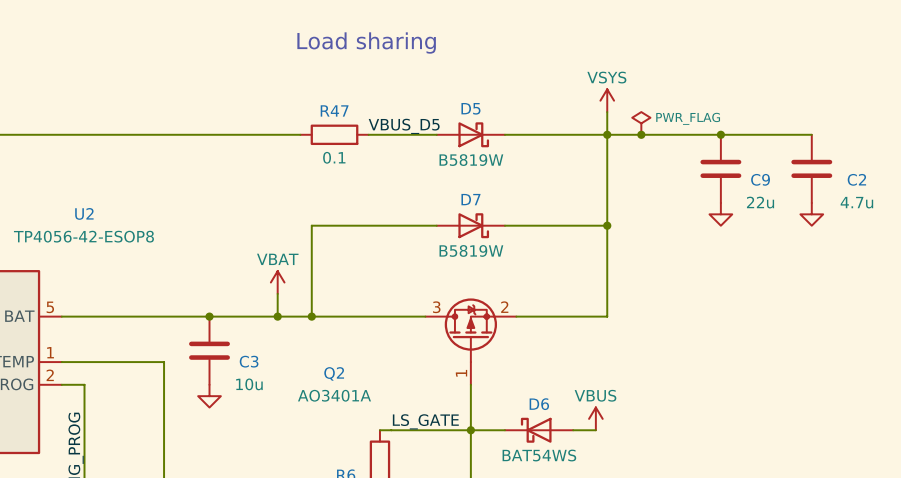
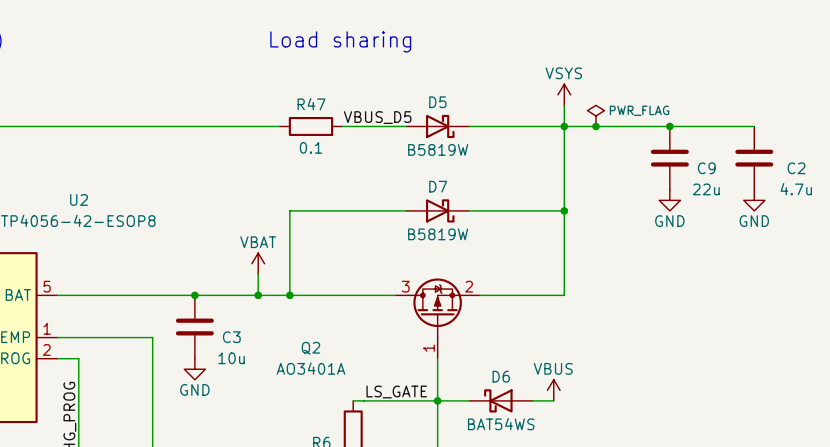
power symbol text: none -> GND (669, 221)
power symbol text: none -> GND (754, 221)
power symbol text: none -> GND (194, 389)

